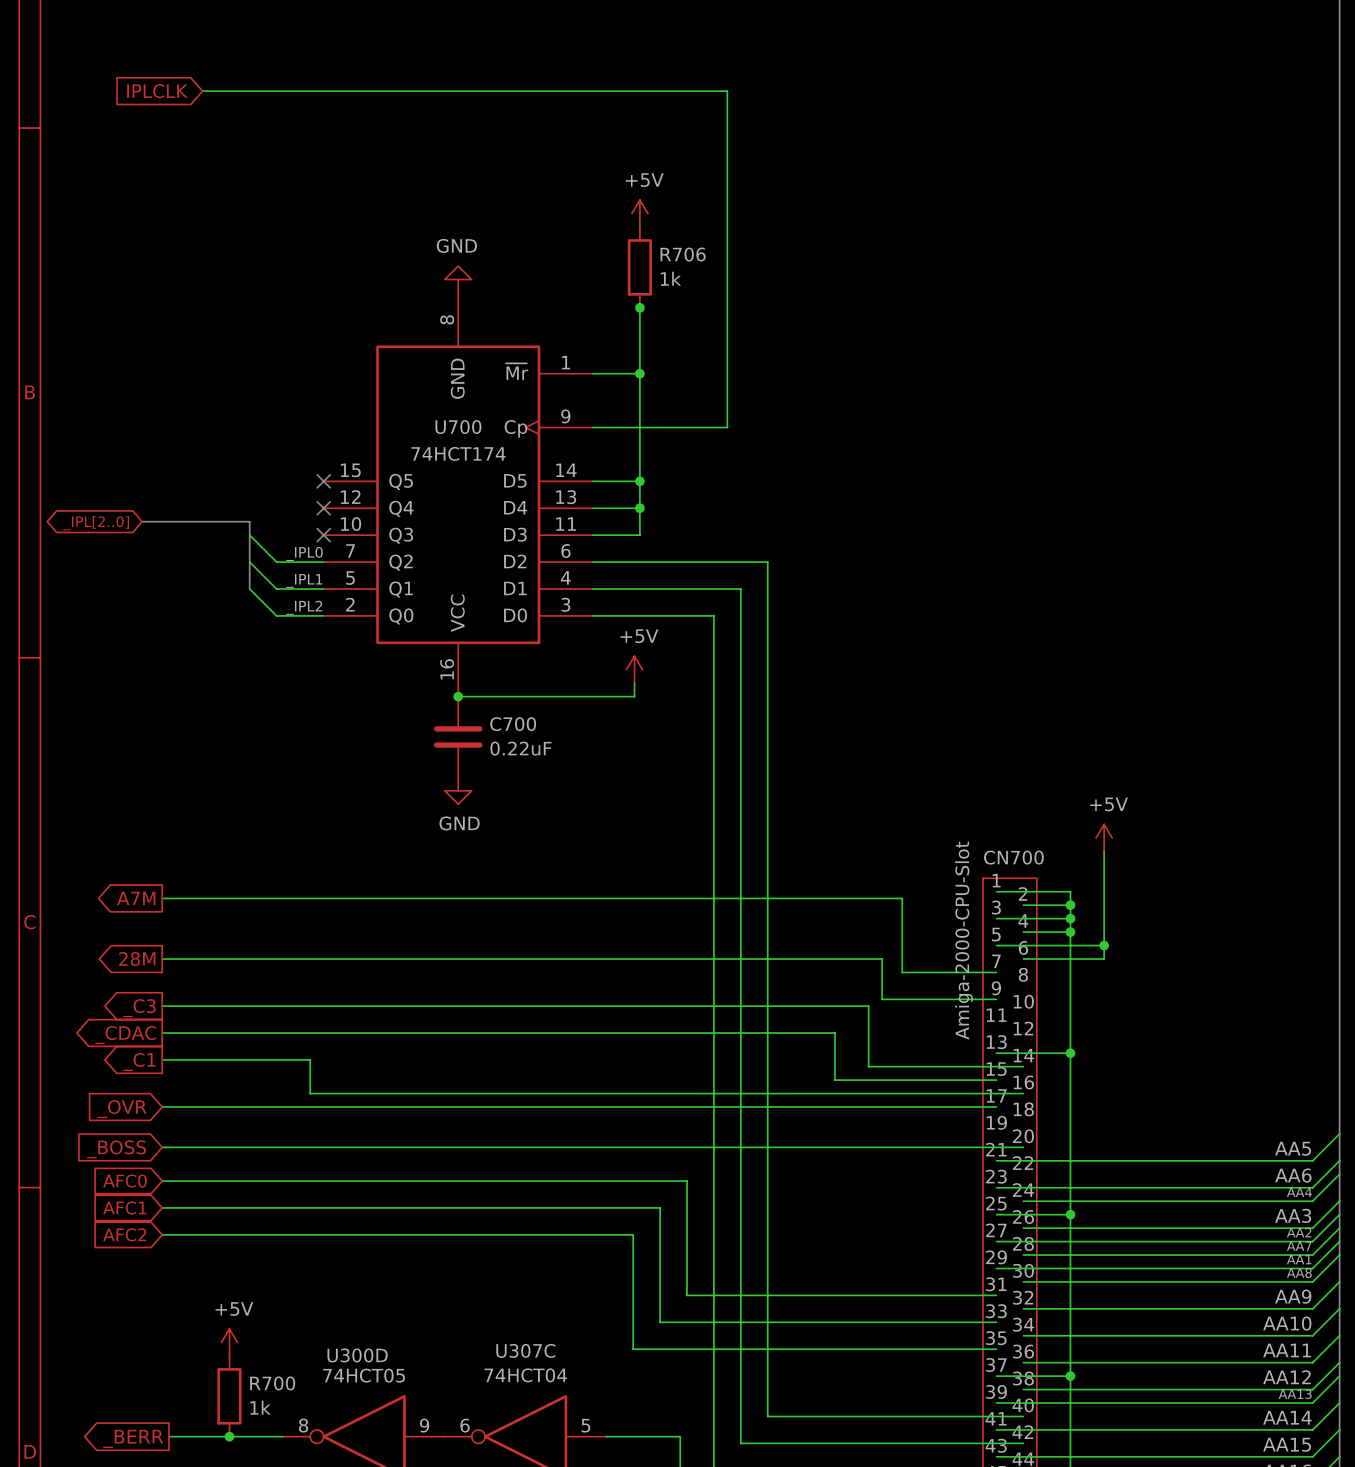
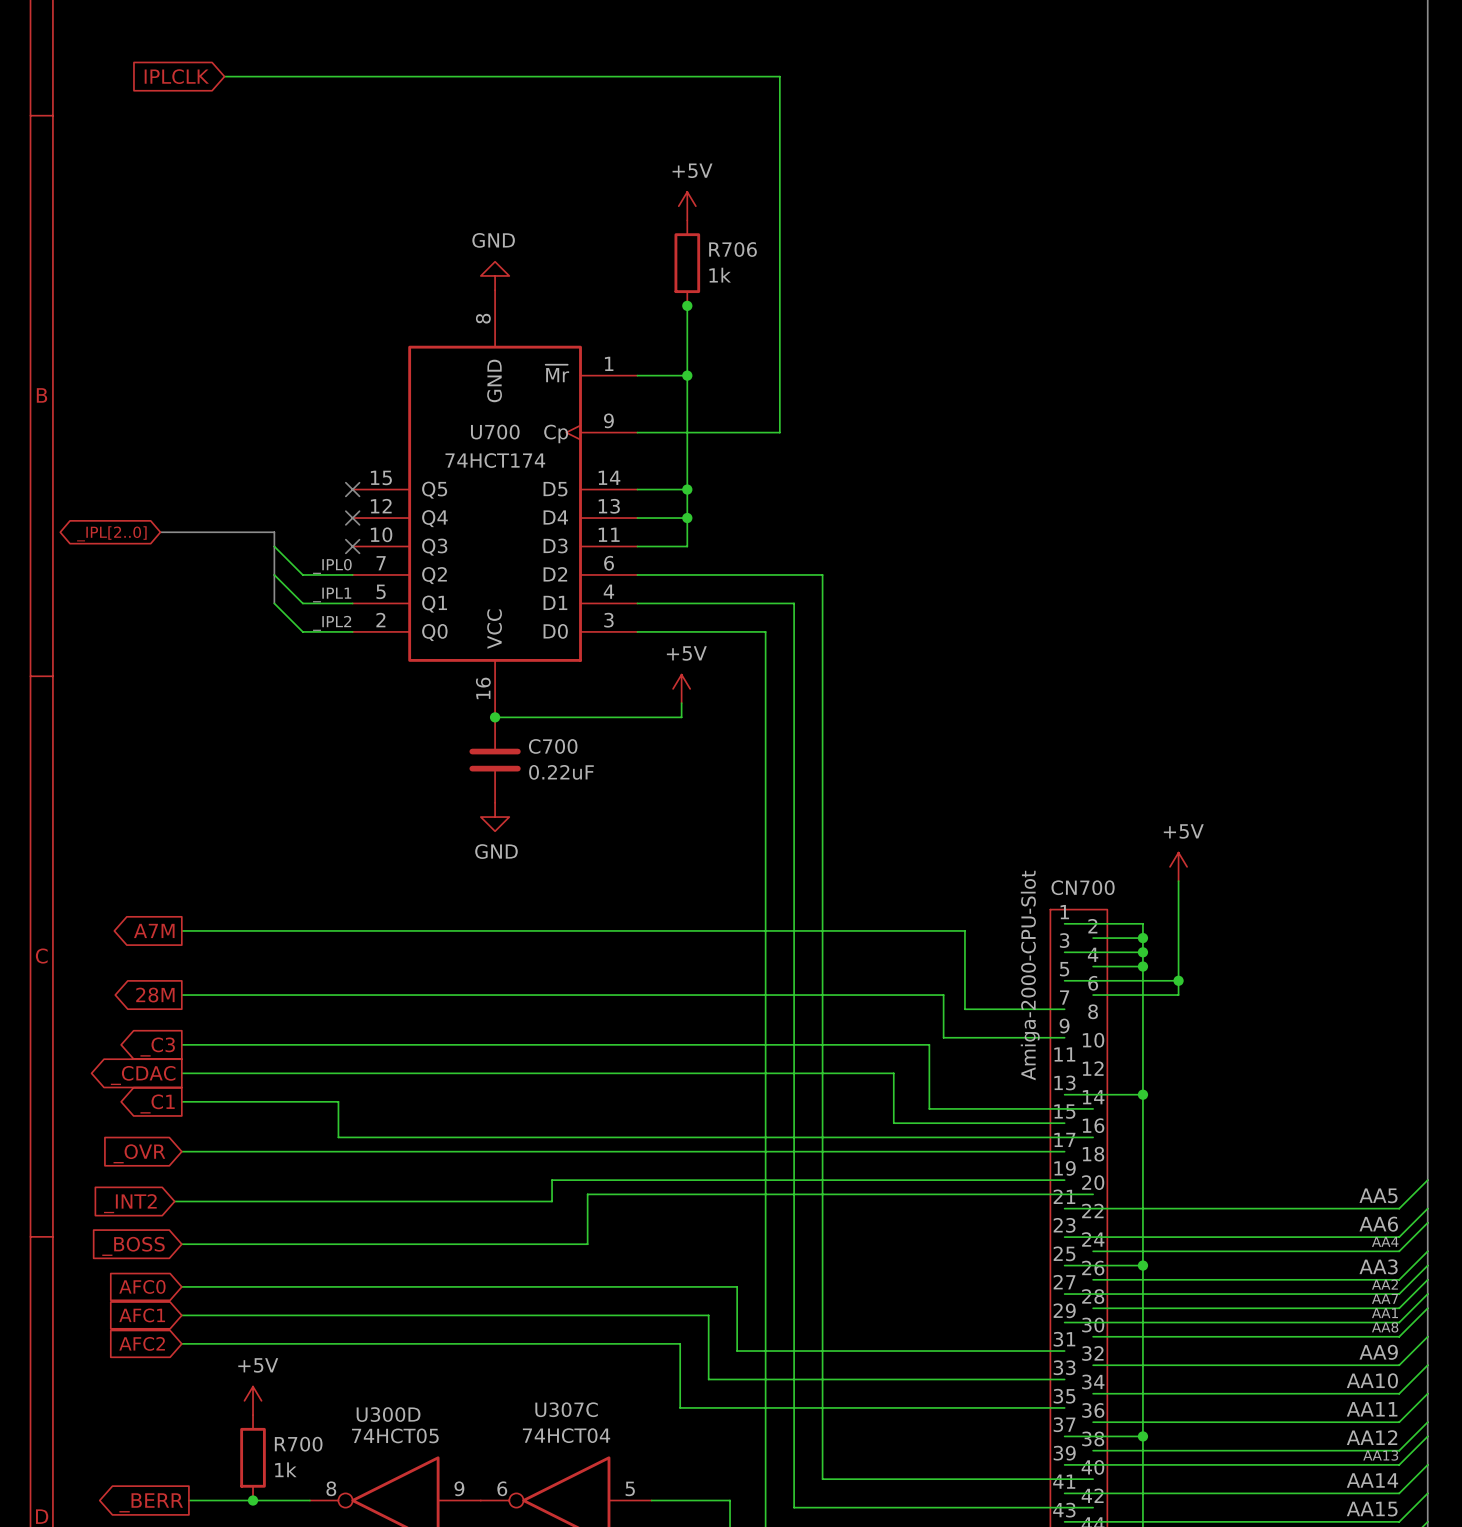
wire: none -> (1064, 1180) (552, 1180) (552, 1201) (174, 1201)
wire: (162, 1147) (545, 1147) -> (181, 1244) (587, 1244) (587, 1194)
global label: _BOSS (116, 1149) -> _INT2 (130, 1203)
global label: AFC0 (124, 1181) -> none
wire: (162, 1181) (686, 1181) (686, 1234) -> none
global label: none -> _BOSS (133, 1246)
global label position: AFC1 (124, 1207) -> AFC1 (142, 1315)
wire: (162, 1207) (660, 1207) (660, 1261) -> (181, 1315) (708, 1315)
global label: AFC2 (124, 1234) -> AFC0 (142, 1286)
wire: (633, 1234) (633, 1288) -> (680, 1286) (737, 1286)
global label: none -> AFC2 (142, 1343)
wire: none -> (181, 1343) (680, 1343)

